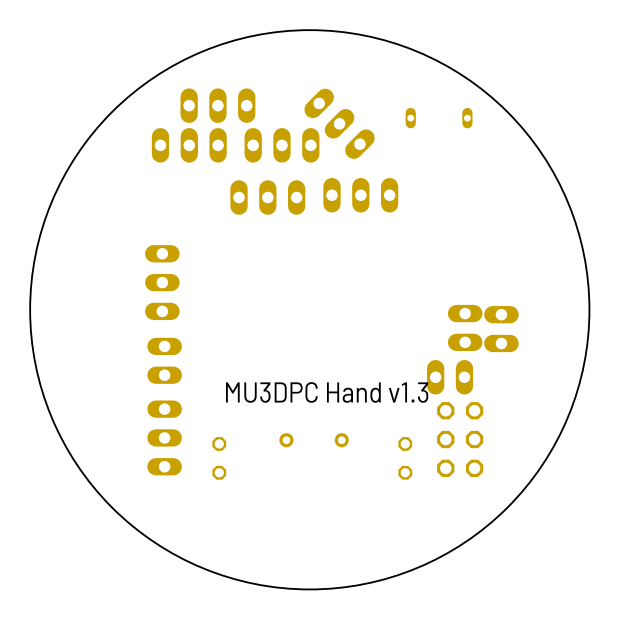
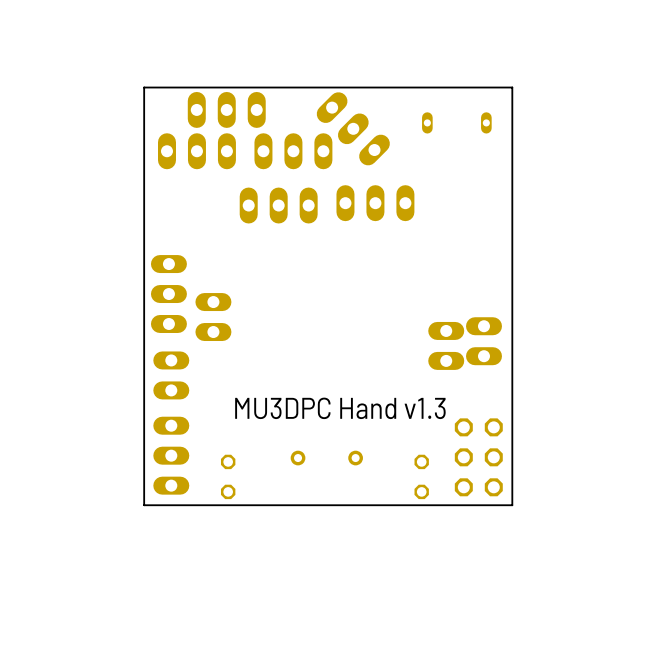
round board edge: [29, 29, 591, 591] -> none
board edge: none -> (512, 87) (144, 87) (144, 505) (512, 505) (512, 87)
part: none -> (213, 317)
part: (501, 329) -> none
part: none -> (446, 345)
part: (450, 377) -> none

